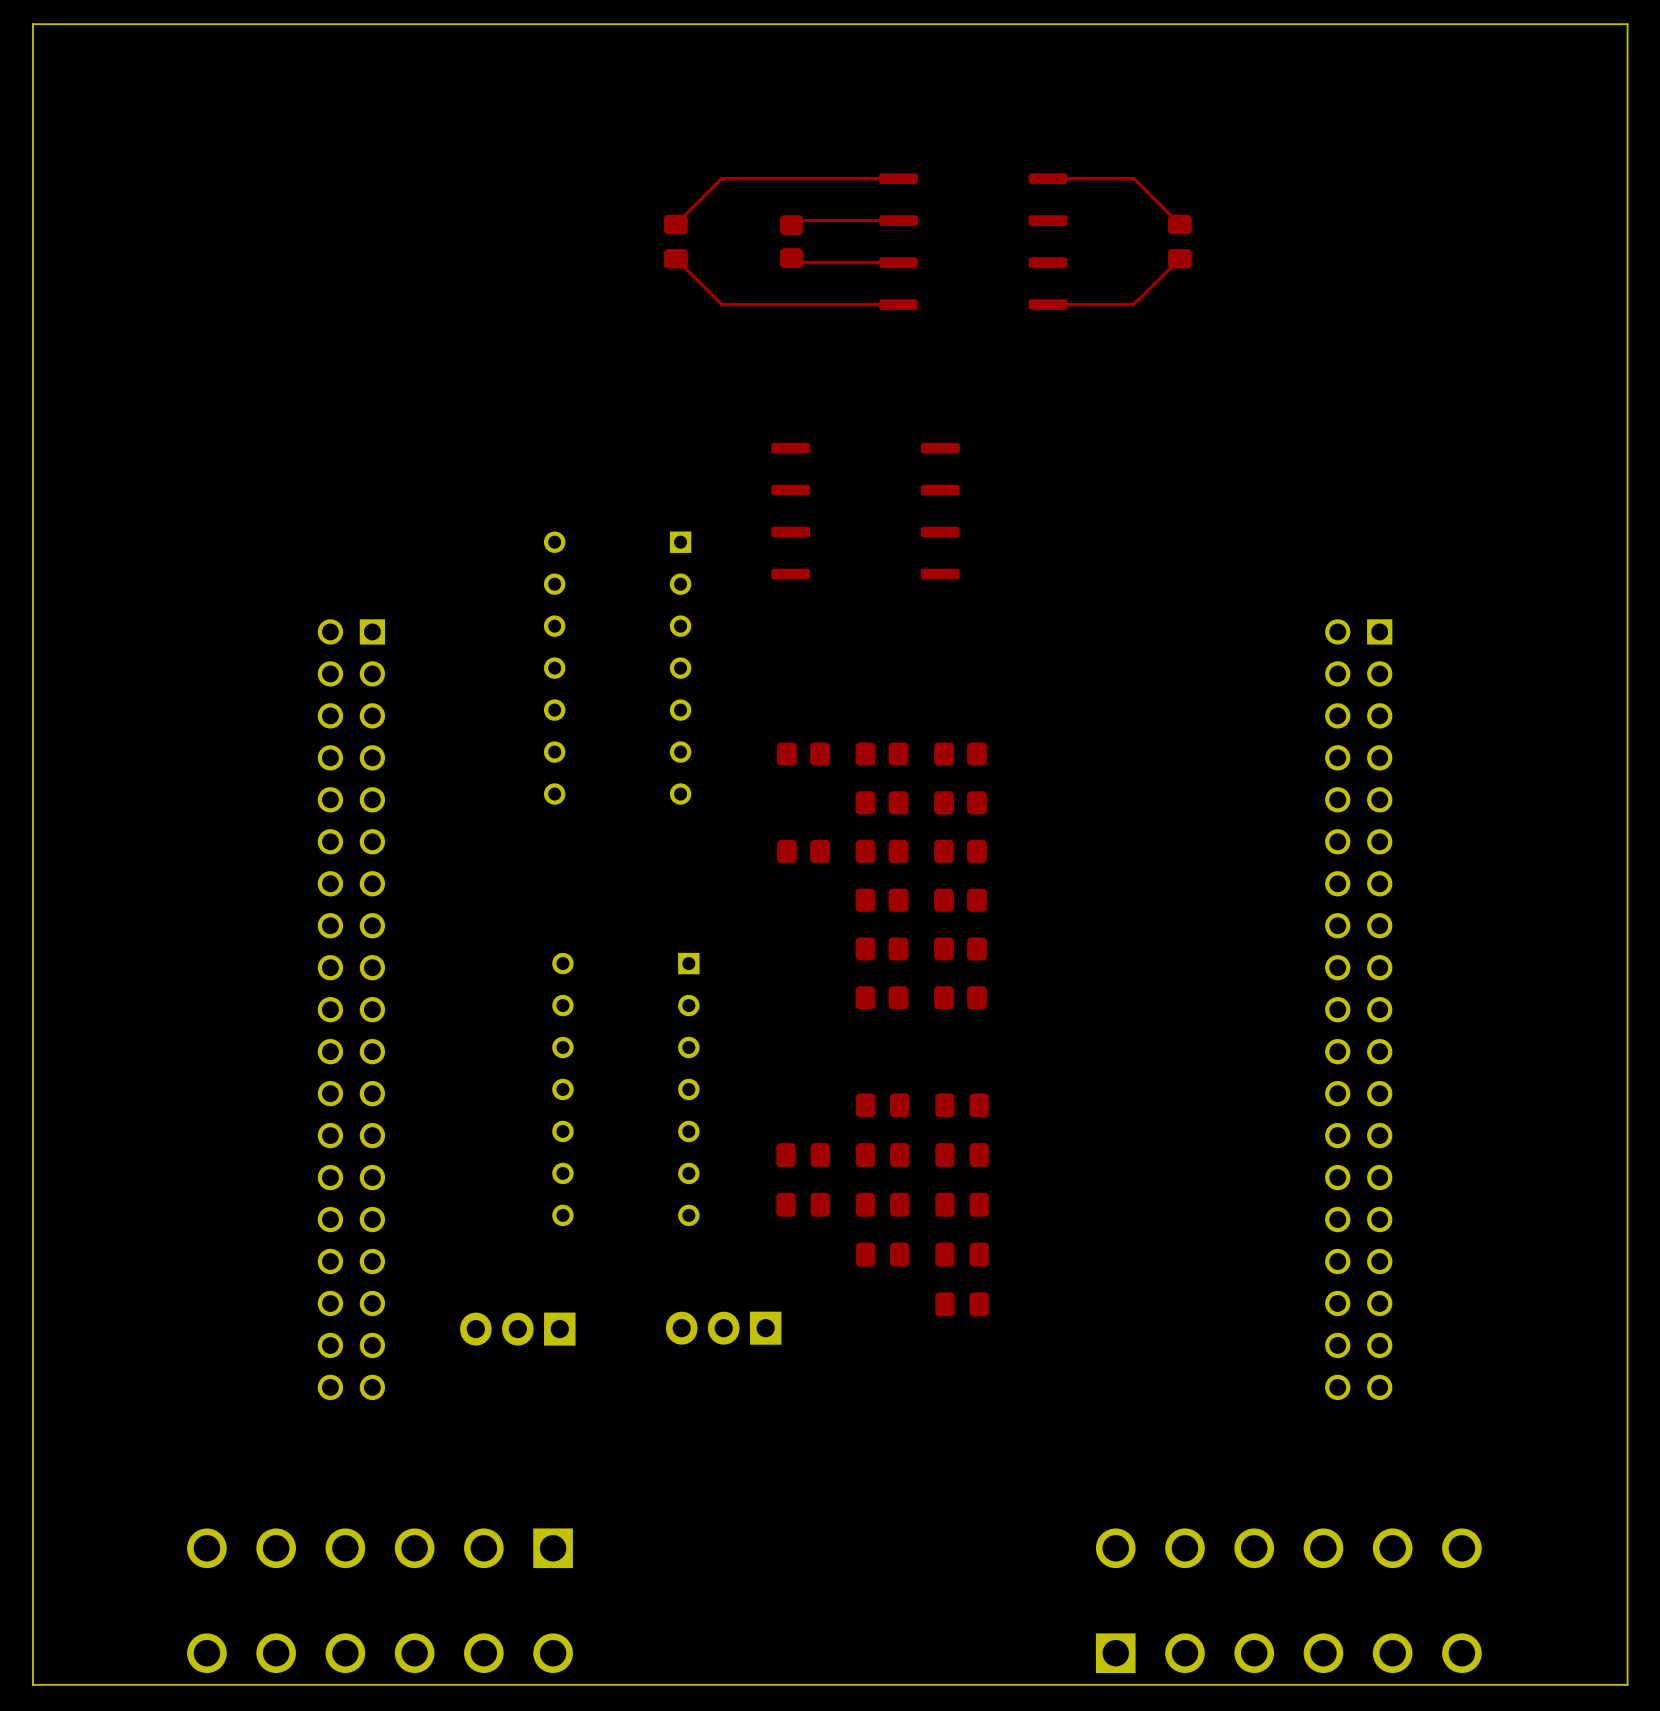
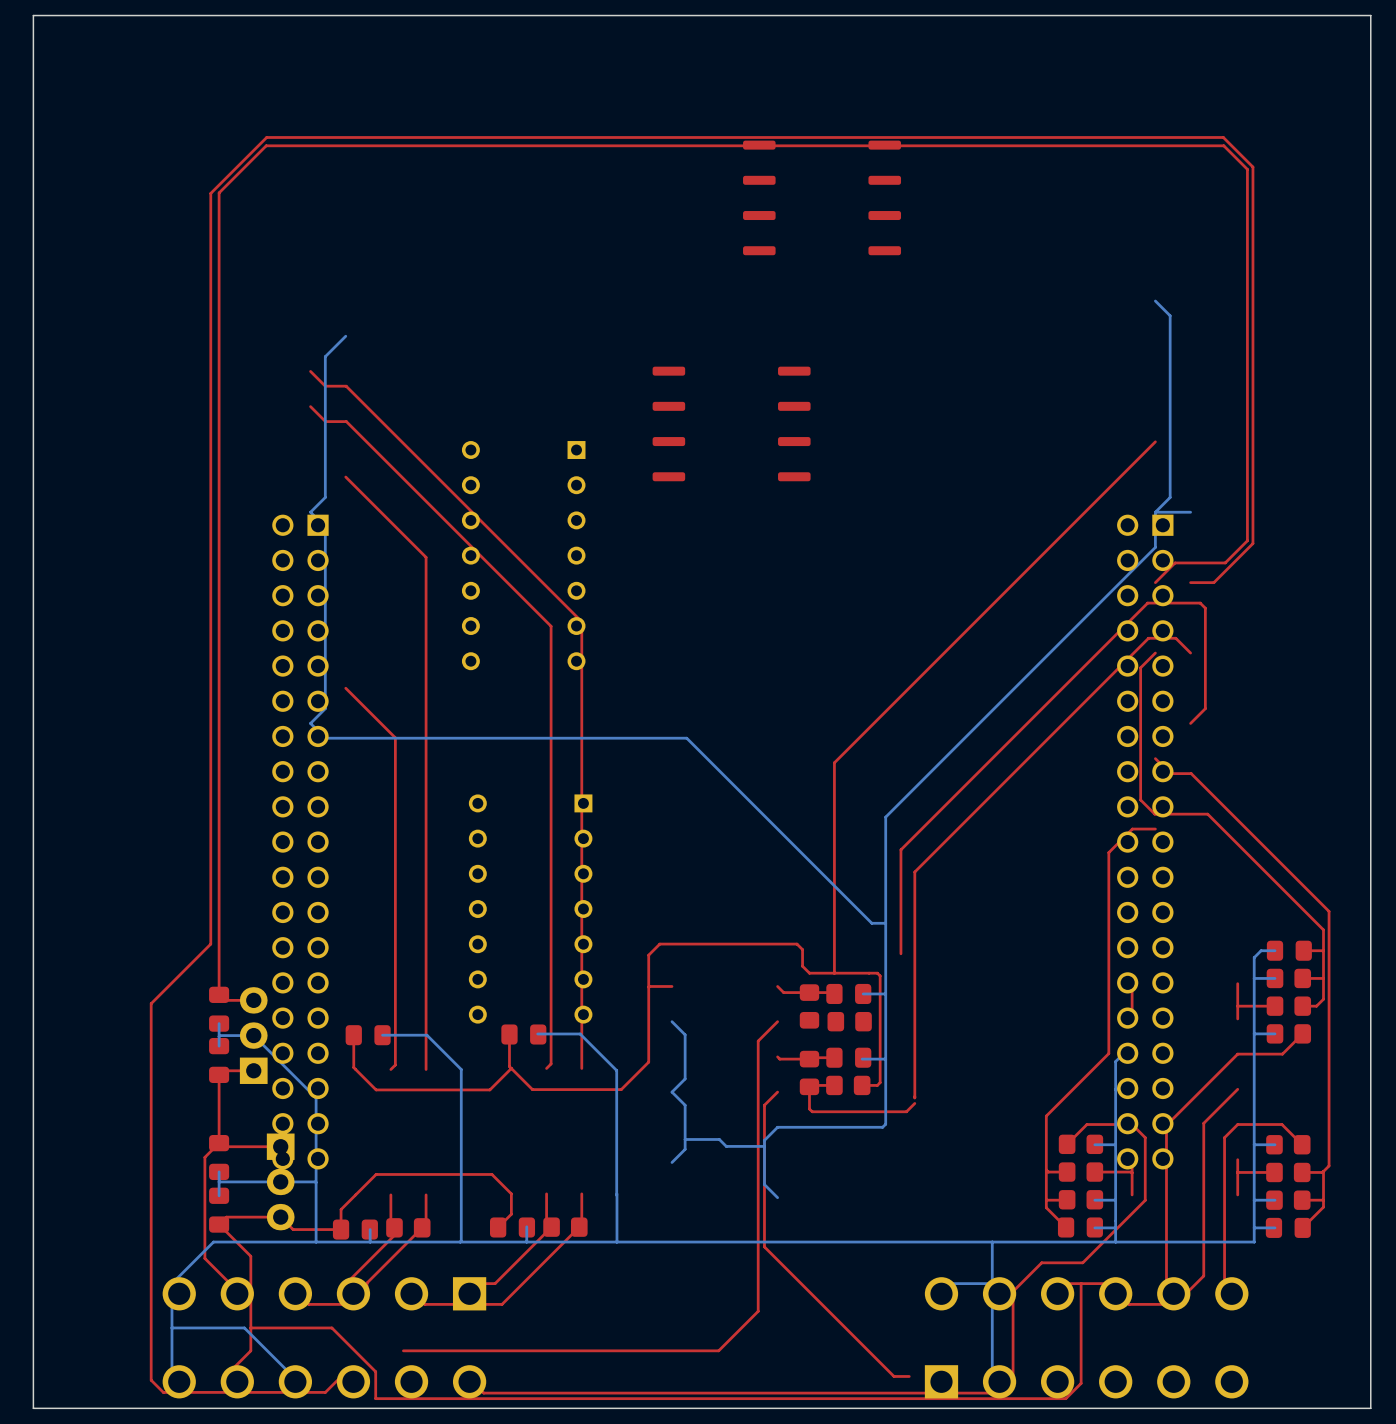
top track: (898, 178) (721, 178) (675, 224) -> none
top track: (1048, 178) (1134, 178) (1179, 224) -> none
top track: (898, 220) (796, 220) (791, 225) -> none
part: (675, 241) -> none
part: (791, 241) -> none
part: (1179, 241) -> none
top track: (675, 258) (721, 304) (898, 304) -> none
top track: (791, 258) (796, 262) (898, 262) -> none
top track: (1179, 258) (1133, 304) (1048, 304) -> none
bottom track: none -> (1155, 301) (1170, 315) (1170, 497) (1155, 512)
bottom track: none -> (345, 336) (325, 356) (325, 497) (310, 512) (325, 526) (325, 708) (310, 723) (325, 738) (686, 738) (871, 923) (885, 923)
top track: none -> (310, 371) (325, 386) (346, 386) (581, 621) (581, 1068)
top track: none -> (310, 406) (325, 421) (346, 421) (551, 626) (551, 1063) (546, 1068)
top track: none -> (1155, 441) (834, 762) (834, 973)
top track: none -> (345, 477) (426, 557) (426, 1069)
bottom track: none -> (1155, 512) (1155, 547) (885, 817) (885, 1124) (882, 1127) (777, 1127) (764, 1140) (764, 1184) (777, 1197)
bottom track: none -> (1190, 512) (1155, 512)
top track: none -> (1155, 582) (1175, 562) (1225, 562) (1247, 540) (1247, 169) (1223, 145) (266, 145) (219, 192) (219, 994) (224, 1000) (253, 1000)
top track: none -> (1190, 582) (1213, 582) (1252, 543) (1252, 167) (1223, 137) (266, 137) (210, 193) (210, 944) (151, 1003) (151, 1380) (163, 1392) (325, 1392) (346, 1371)
part: (803, 754) -> none
part: (882, 754) -> none
part: (960, 754) -> none
top track: none -> (1155, 653) (1140, 667) (1140, 799) (1154, 814) (1207, 814) (1323, 929) (1323, 999) (1316, 1006) (1302, 1006)
top track: none -> (1190, 653) (1175, 638) (1148, 638) (914, 872) (914, 1097)
part: (882, 802) -> none
part: (960, 802) -> none
top track: none -> (345, 688) (395, 737) (395, 1064) (390, 1069)
part: (803, 851) -> none
part: (882, 851) -> none
part: (960, 851) -> none
top track: none -> (1190, 723) (1205, 708) (1205, 608) (1200, 603) (1147, 603) (900, 849) (900, 953)
part: (882, 900) -> none
part: (960, 900) -> none
top track: none -> (1155, 758) (1170, 773) (1191, 773) (1329, 911) (1329, 1165) (1322, 1172) (1302, 1172)
part: (882, 949) -> none
part: (960, 949) -> none
top track: none -> (1155, 829) (1132, 829) (1108, 852) (1108, 1053) (1046, 1116) (1046, 1207) (1066, 1227)
part: (882, 997) -> none
part: (960, 997) -> none
part: (882, 1105) -> none
part: (962, 1105) -> none
bottom track: none -> (1275, 950) (1261, 950) (1254, 957) (1254, 1241)
part: none -> (1289, 950)
top track: none -> (1323, 950) (1303, 950)
part: (803, 1155) -> none
part: (882, 1155) -> none
part: (962, 1155) -> none
bottom track: none -> (1275, 978) (1254, 978)
part: none -> (1288, 978)
top track: none -> (1323, 978) (1302, 978)
top track: none -> (1132, 983) (1132, 1018)
top track: none -> (1237, 983) (1237, 1018)
top track: none -> (672, 986) (648, 987)
top track: none -> (777, 986) (783, 992) (834, 992)
part: none -> (848, 993)
bottom track: none -> (885, 993) (863, 993)
part footprint: [935, 1192, 989, 1217] -> [799, 984, 820, 1029]
part: (803, 1204) -> none
part: (882, 1204) -> none
top track: none -> (1275, 1006) (1237, 1006)
part: none -> (1288, 1006)
part: none -> (219, 1009)
bottom track: none -> (672, 1021) (685, 1034) (685, 1078) (672, 1092) (685, 1105) (685, 1149) (672, 1162)
top track: none -> (777, 1021) (758, 1041) (758, 1311) (718, 1350) (403, 1350)
part: none -> (849, 1021)
bottom track: none -> (219, 1023) (219, 1046)
bottom track: none -> (537, 1033) (580, 1033) (616, 1070) (616, 1195)
bottom track: none -> (1275, 1033) (1254, 1033)
part: none -> (1288, 1033)
top track: none -> (1302, 1033) (1282, 1054) (1237, 1054) (1166, 1125) (1166, 1283)
top track: none -> (353, 1035) (353, 1067) (376, 1089) (489, 1089) (511, 1068)
part: none -> (368, 1035)
bottom track: none -> (382, 1035) (426, 1035) (461, 1069) (460, 1242)
top track: none -> (509, 1034) (509, 1066) (532, 1089) (621, 1089) (648, 1062) (648, 955) (659, 944) (797, 944) (802, 949) (802, 966) (809, 973) (877, 973) (880, 975) (880, 1082) (877, 1085) (862, 1085)
part: none -> (523, 1034)
part: none -> (253, 1035)
bottom track: none -> (219, 1036) (253, 1035) (316, 1097) (316, 1242)
part: (882, 1254) -> none
part: (962, 1254) -> none
bottom track: none -> (1132, 1054) (1123, 1054) (1115, 1061) (1115, 1241)
top track: none -> (777, 1056) (779, 1059) (834, 1057)
part: none -> (848, 1057)
bottom track: none -> (885, 1059) (862, 1059)
part: none -> (219, 1060)
top track: none -> (253, 1070) (223, 1070) (219, 1074) (219, 1143)
part: none -> (809, 1072)
top track: none -> (834, 1085) (809, 1086) (809, 1108) (812, 1111) (906, 1111) (914, 1103)
part: none -> (848, 1085)
part: (962, 1304) -> none
top track: none -> (1237, 1089) (1203, 1123) (1203, 1275) (1175, 1304) (1129, 1304) (1108, 1283) (1050, 1283)
top track: none -> (777, 1092) (764, 1105) (764, 1246) (894, 1376) (909, 1376)
part: (723, 1328) -> none
part: (517, 1329) -> none
bottom track: none -> (685, 1139) (719, 1139) (726, 1146) (764, 1146)
top track: none -> (219, 1143) (222, 1146) (280, 1146)
top track: none -> (219, 1143) (204, 1157) (204, 1258) (230, 1283)
top track: none -> (1067, 1144) (1086, 1124) (1132, 1124) (1145, 1137) (1145, 1200) (1082, 1262) (1041, 1262) (1013, 1291) (1013, 1380) (1000, 1393) (483, 1393) (462, 1371)
part: none -> (1080, 1144)
bottom track: none -> (1115, 1144) (1094, 1144)
bottom track: none -> (1275, 1144) (1254, 1144)
part: none -> (1288, 1144)
top track: none -> (1302, 1144) (1281, 1124) (1237, 1124) (1224, 1137) (1224, 1283)
part: none -> (219, 1157)
top track: none -> (1132, 1159) (1132, 1194)
top track: none -> (1237, 1159) (1237, 1194)
top track: none -> (1046, 1169) (1048, 1172) (1067, 1172)
bottom track: none -> (219, 1171) (219, 1195)
top track: none -> (1323, 1171) (1323, 1207) (1302, 1227)
part: none -> (1080, 1172)
top track: none -> (1094, 1172) (1132, 1172)
top track: none -> (1274, 1172) (1237, 1172)
part: none -> (1288, 1172)
bottom track: none -> (219, 1181) (316, 1182)
part: none -> (280, 1181)
top track: none -> (546, 1193) (546, 1222) (551, 1227) (495, 1283) (462, 1283)
top track: none -> (581, 1193) (581, 1224) (502, 1304) (425, 1304) (404, 1283)
bottom track: none -> (616, 1193) (616, 1241)
top track: none -> (390, 1194) (390, 1224) (394, 1227) (394, 1235) (346, 1283)
top track: none -> (426, 1194) (426, 1223) (366, 1283) (366, 1292) (354, 1304) (308, 1304) (288, 1283)
top track: none -> (1067, 1200) (1046, 1200)
part: none -> (1080, 1199)
bottom track: none -> (1115, 1200) (1094, 1200)
bottom track: none -> (1275, 1200) (1254, 1200)
part: none -> (1288, 1200)
top track: none -> (1323, 1200) (1302, 1200)
part: none -> (219, 1210)
bottom track: none -> (526, 1226) (526, 1242)
part: none -> (565, 1227)
part: none -> (408, 1227)
top track: none -> (498, 1227) (511, 1214) (511, 1193) (491, 1174) (376, 1174) (341, 1209) (341, 1229) (293, 1229) (280, 1217) (226, 1217) (219, 1224) (250, 1256) (250, 1350) (230, 1371)
part: none -> (512, 1227)
part: none -> (1080, 1227)
bottom track: none -> (1115, 1227) (1094, 1227)
bottom track: none -> (1275, 1227) (1254, 1227)
part: none -> (1288, 1227)
part: none -> (355, 1229)
bottom track: none -> (370, 1229) (370, 1242)
bottom track: none -> (992, 1242) (992, 1371)
bottom track: none -> (1254, 1242) (213, 1242) (171, 1283) (171, 1371)
bottom track: none -> (992, 1283) (934, 1283)
top track: none -> (1081, 1283) (1081, 1383) (1065, 1398) (375, 1398) (375, 1371) (331, 1327) (250, 1327)
bottom track: none -> (171, 1327) (244, 1327) (288, 1371)

